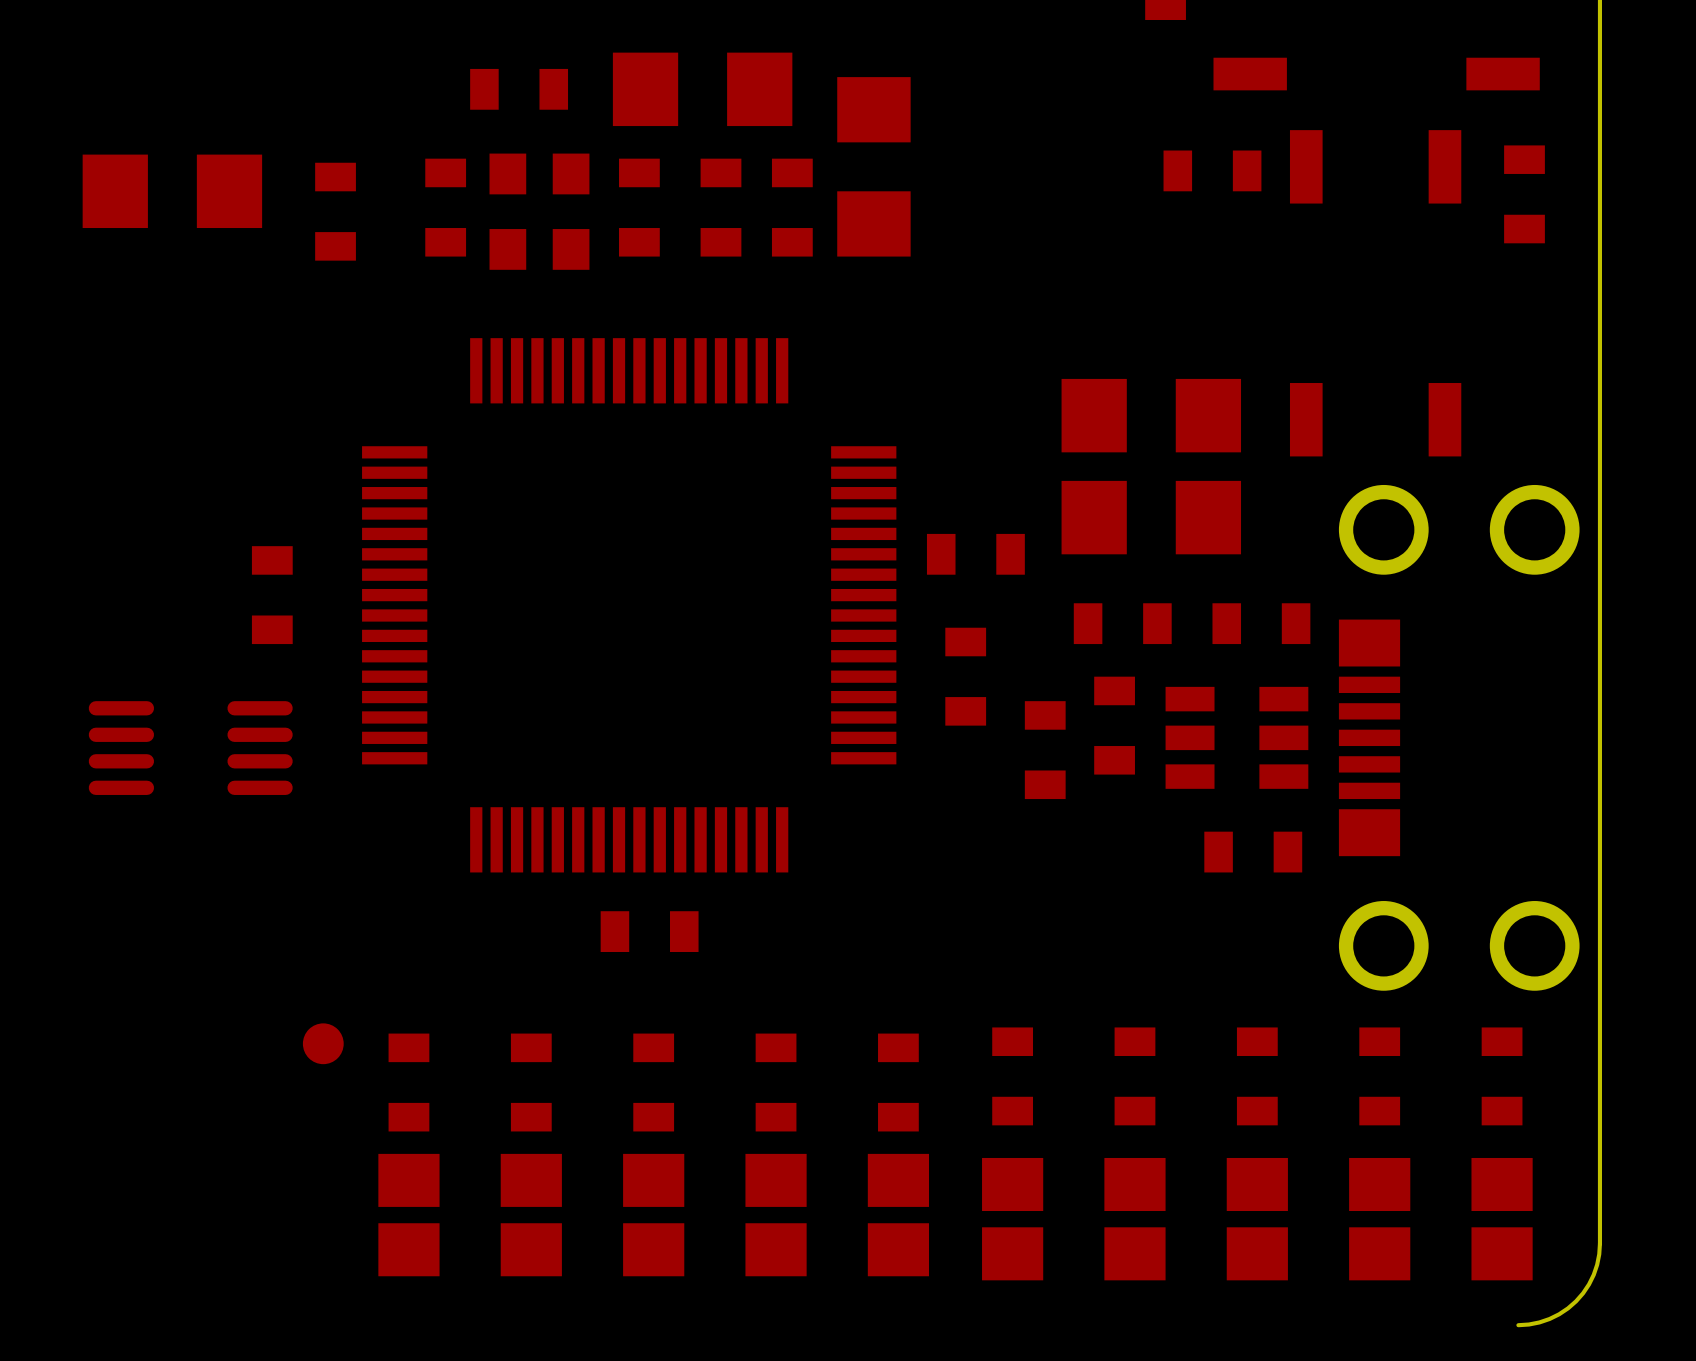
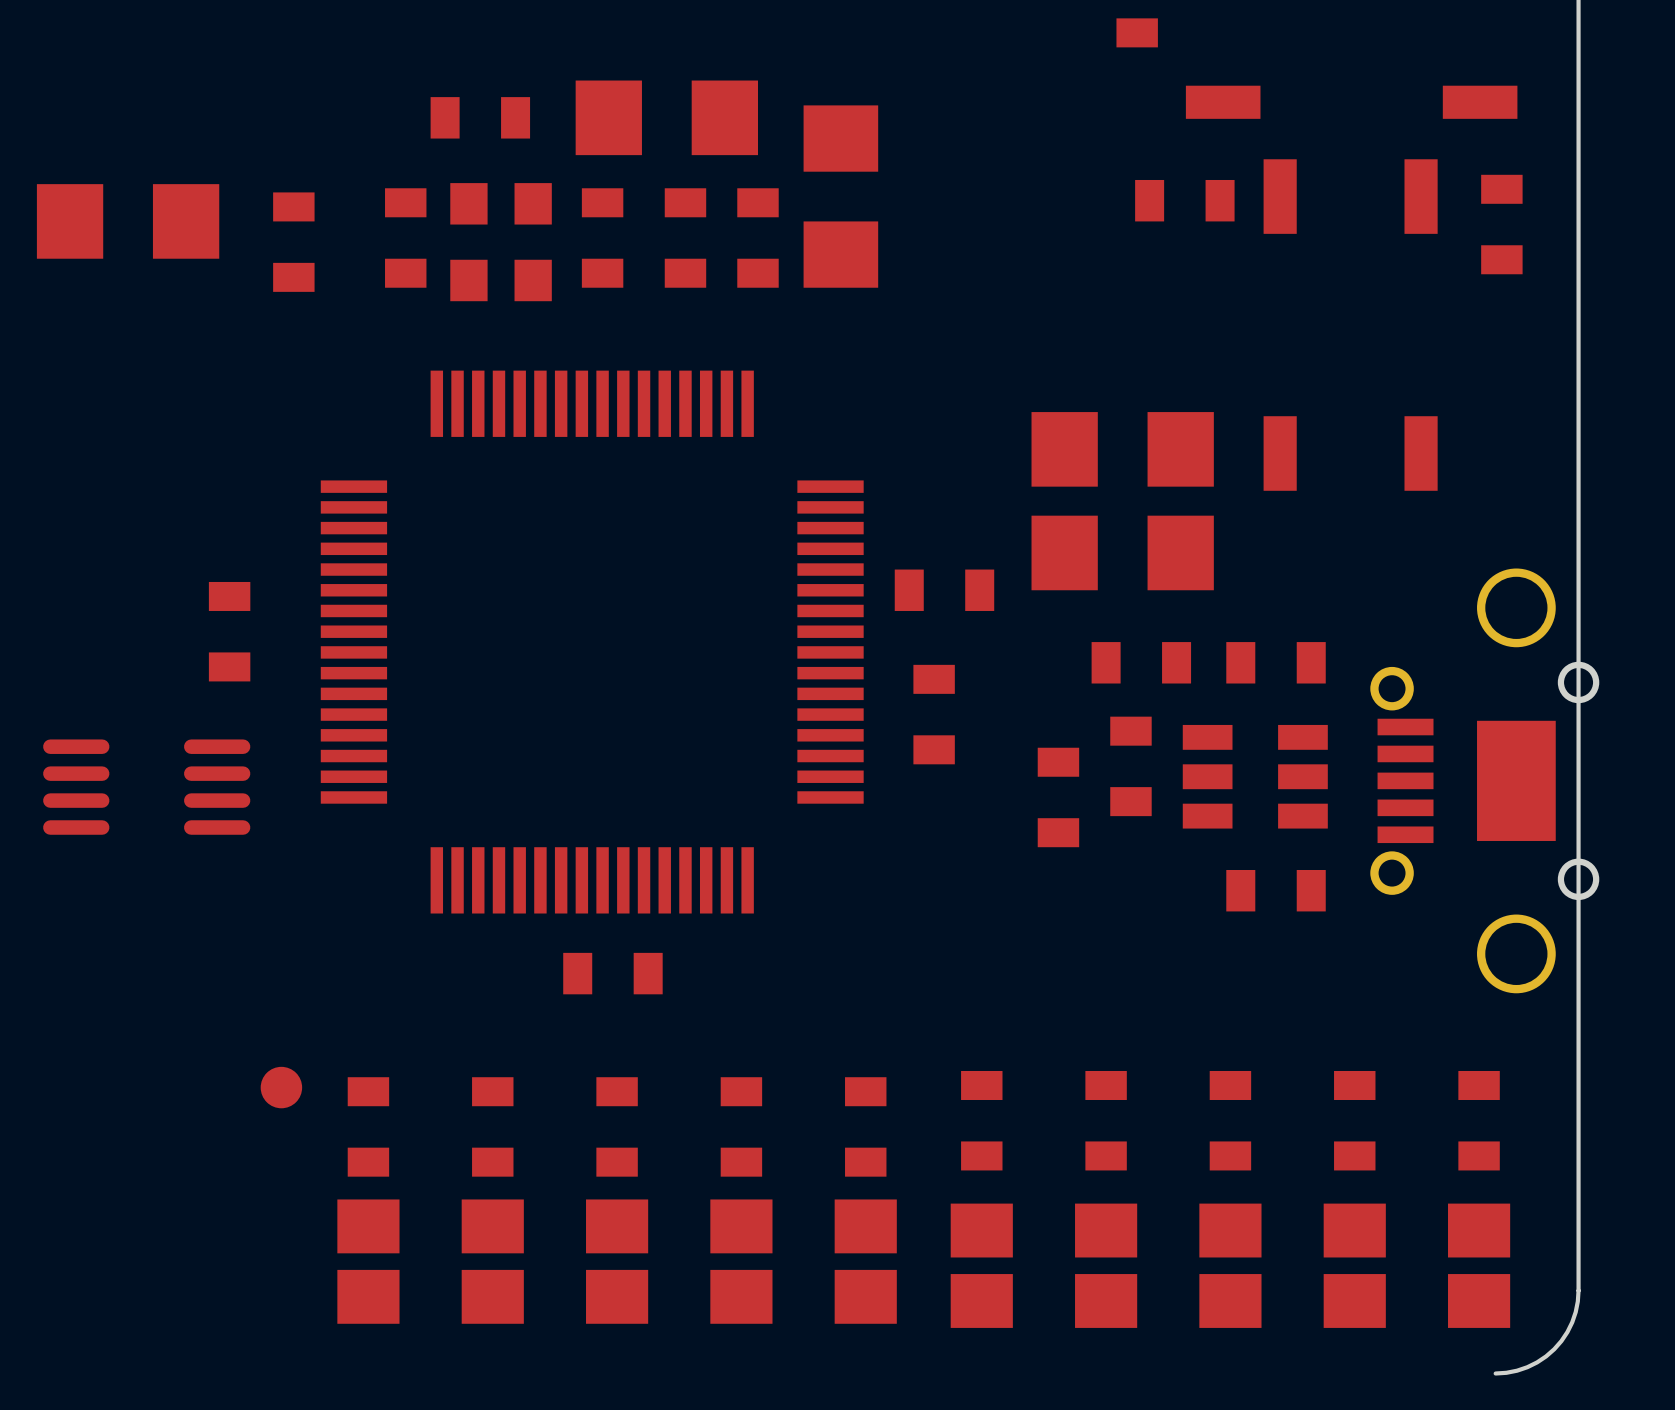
part: (1122, 623) -> none
part position: (1261, 623) -> (1276, 662)
part: none -> (1141, 662)
part: (1114, 725) -> none
part: none -> (1130, 766)
part position: (1236, 737) -> (1255, 776)
part: (1459, 737) -> none
part: none -> (1484, 780)
part: (1045, 750) -> none
part: none -> (1058, 797)
part position: (1253, 852) -> (1276, 890)

